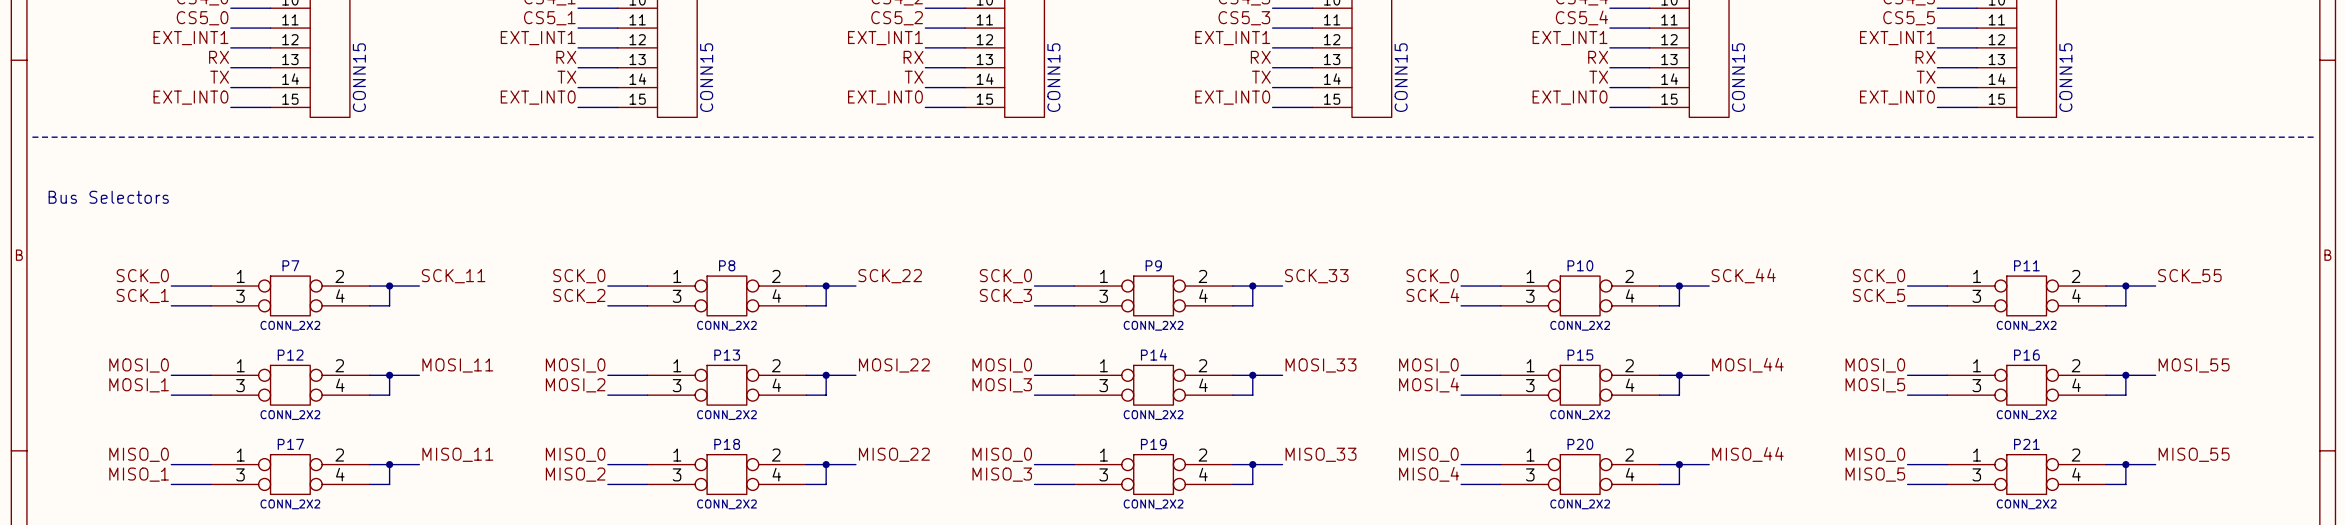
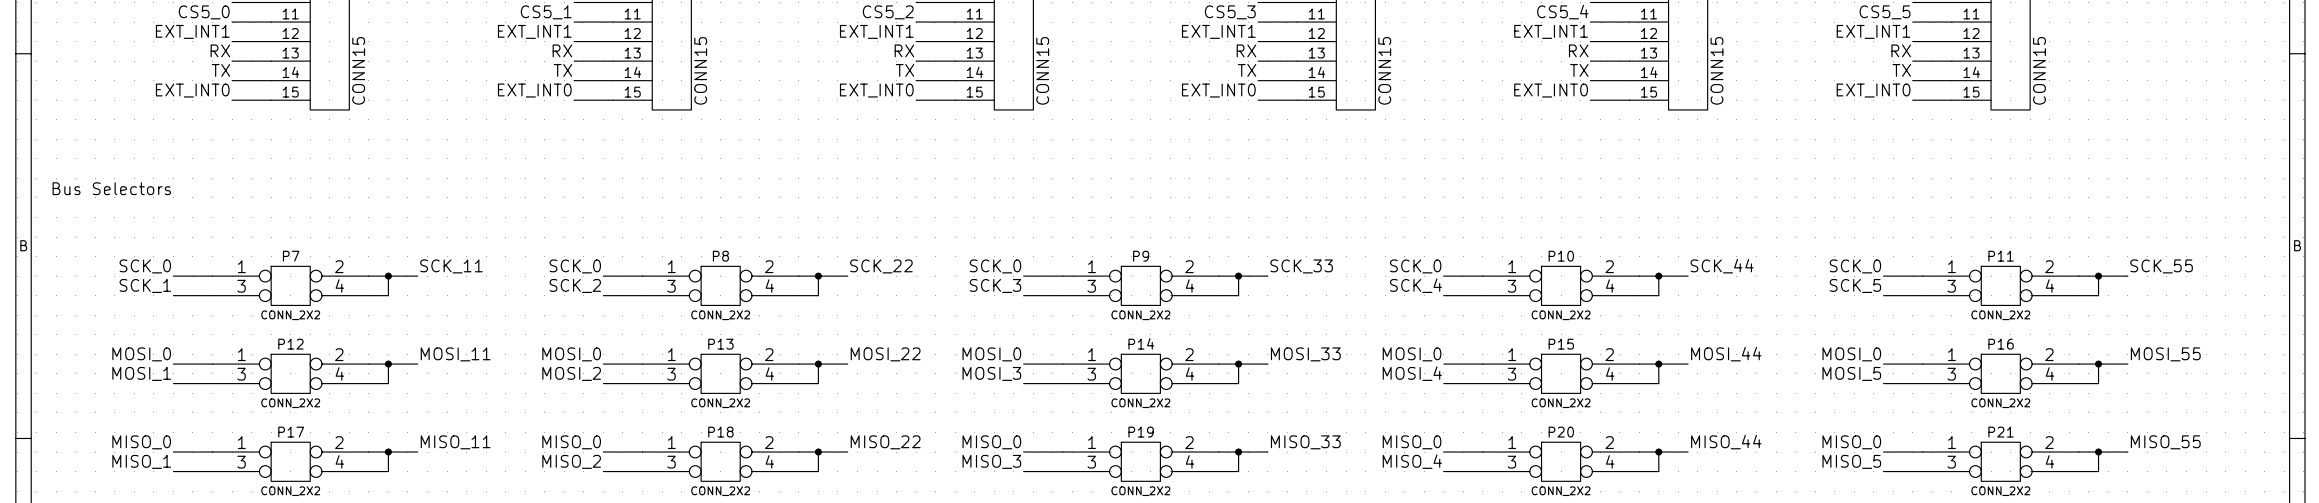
line: (32, 137) (2314, 137) -> none

